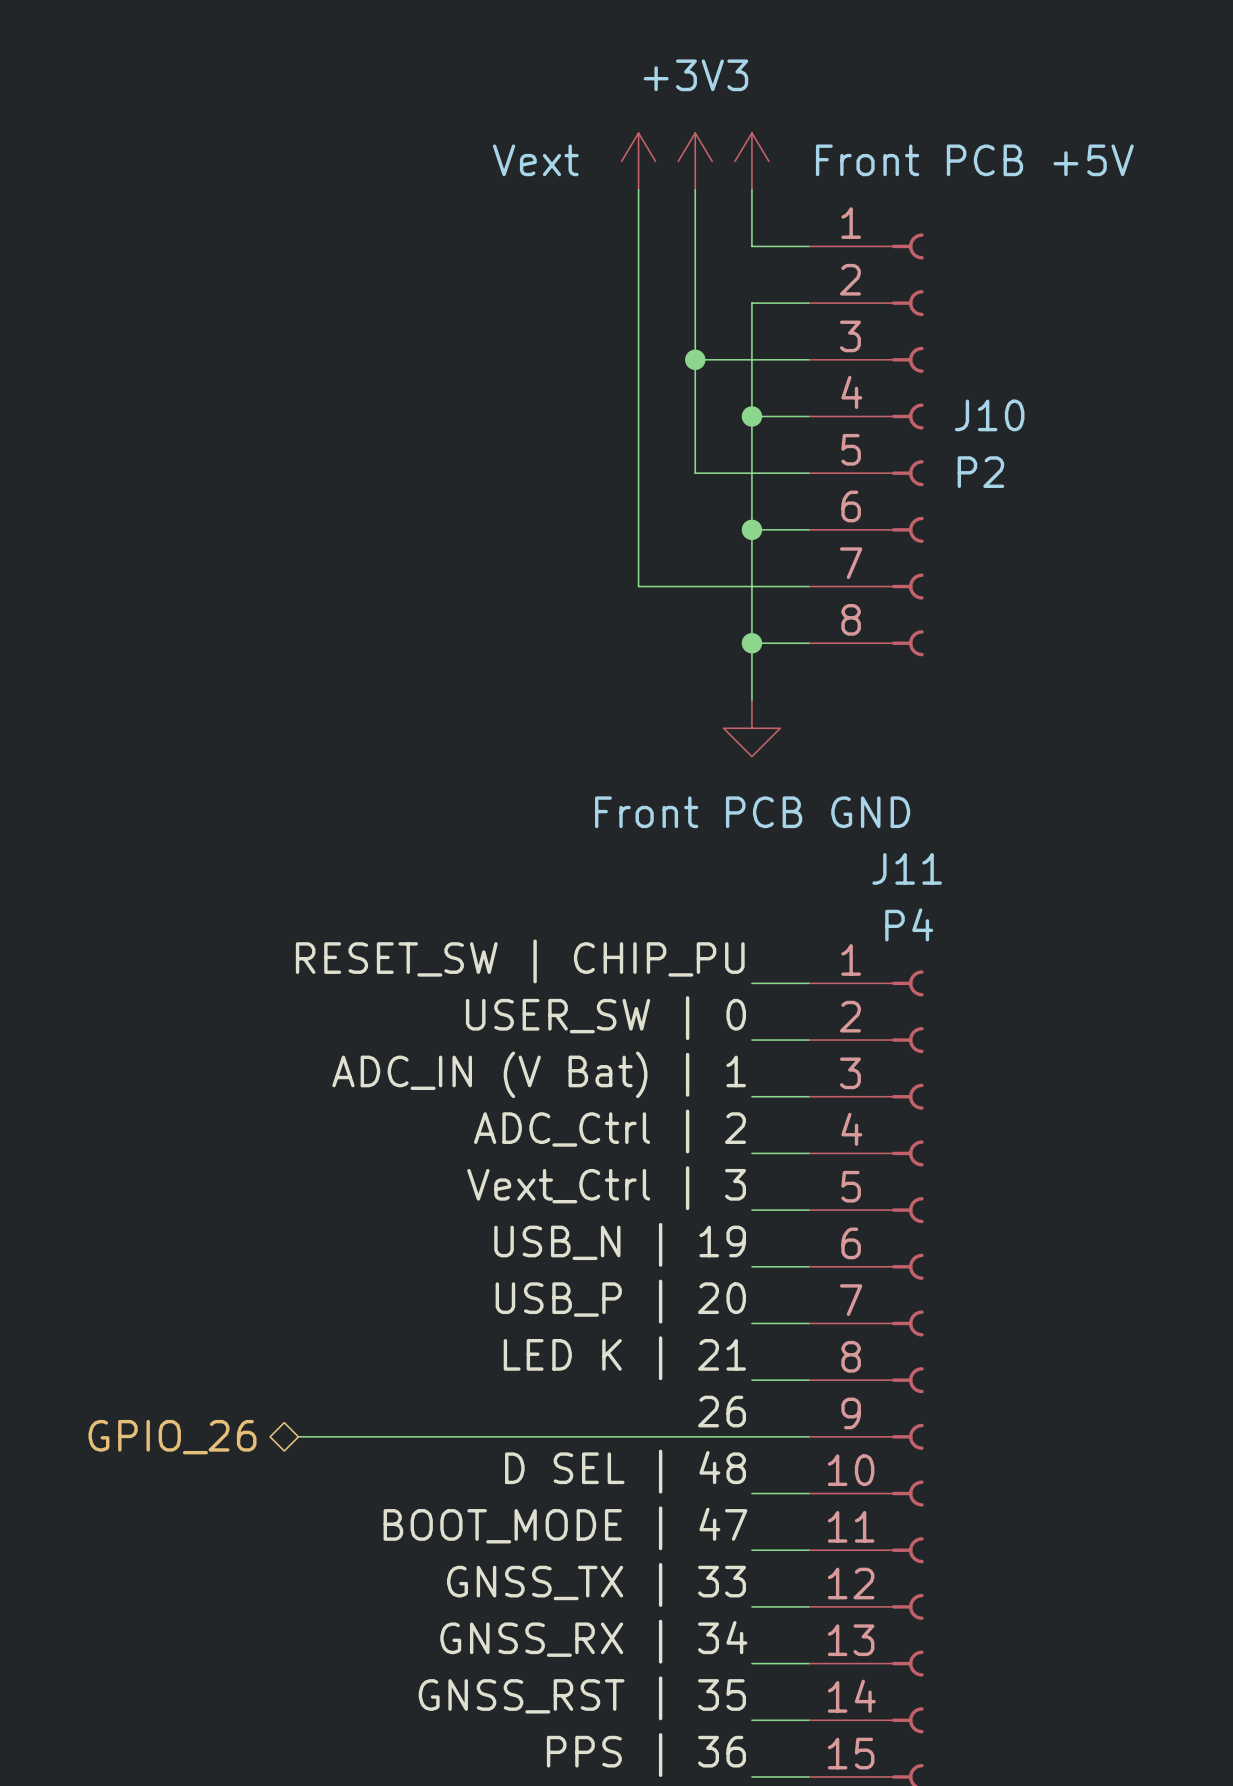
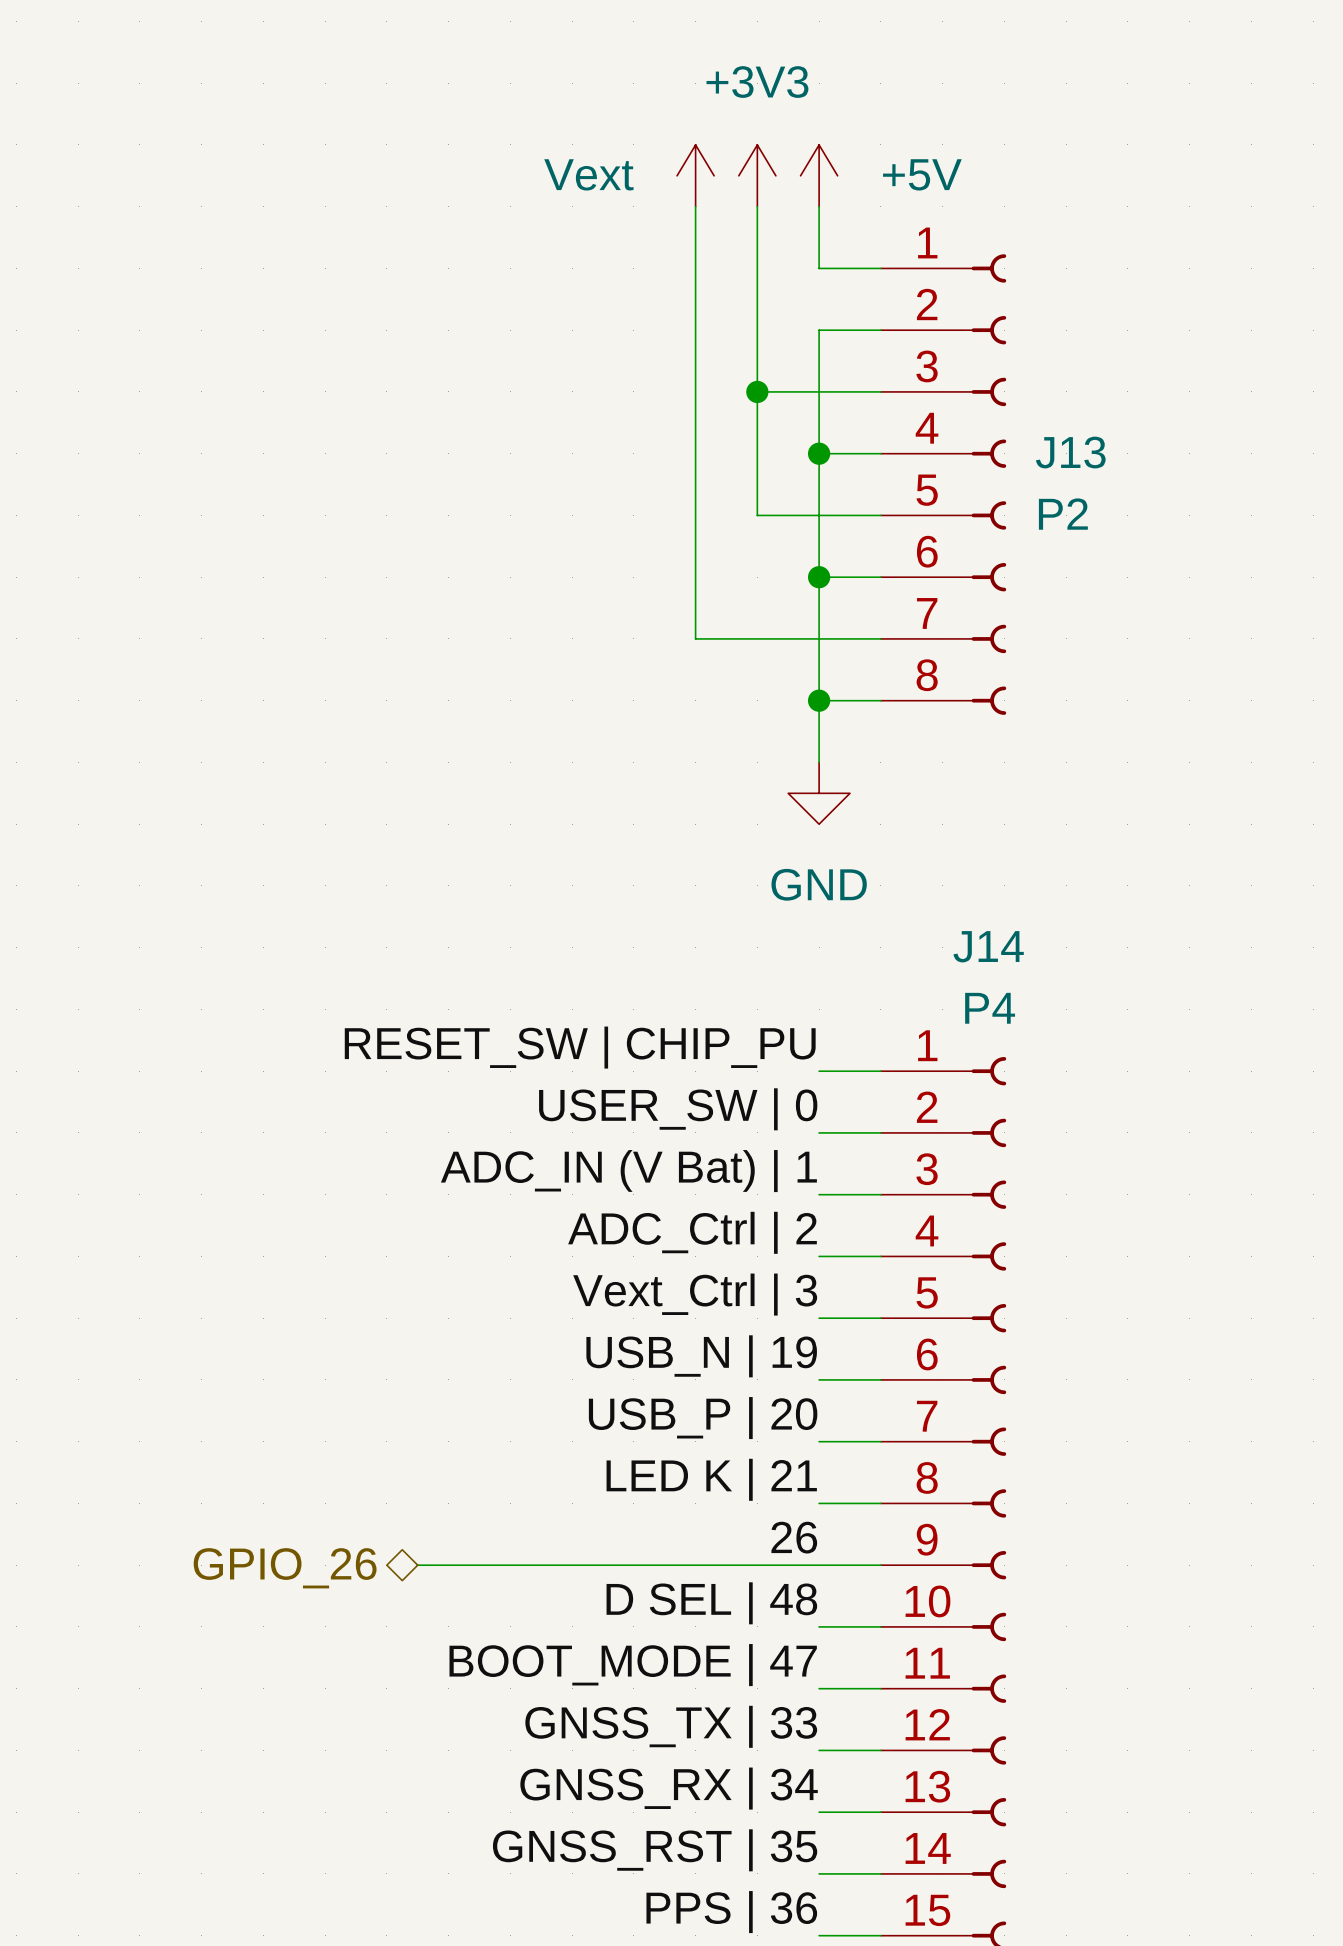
power symbol: Front PCB +5V (751, 161) -> +5V (819, 175)
J10 name: J10 (989, 415) -> J13 (1070, 452)
power symbol: Front PCB GND (751, 728) -> GND (819, 793)
J11 name: J11 (907, 868) -> J14 (988, 946)
wire: (298, 1436) (383, 1436) -> none
hierarchical label position: GPIO_26 (172, 1437) -> GPIO_26 (285, 1568)

